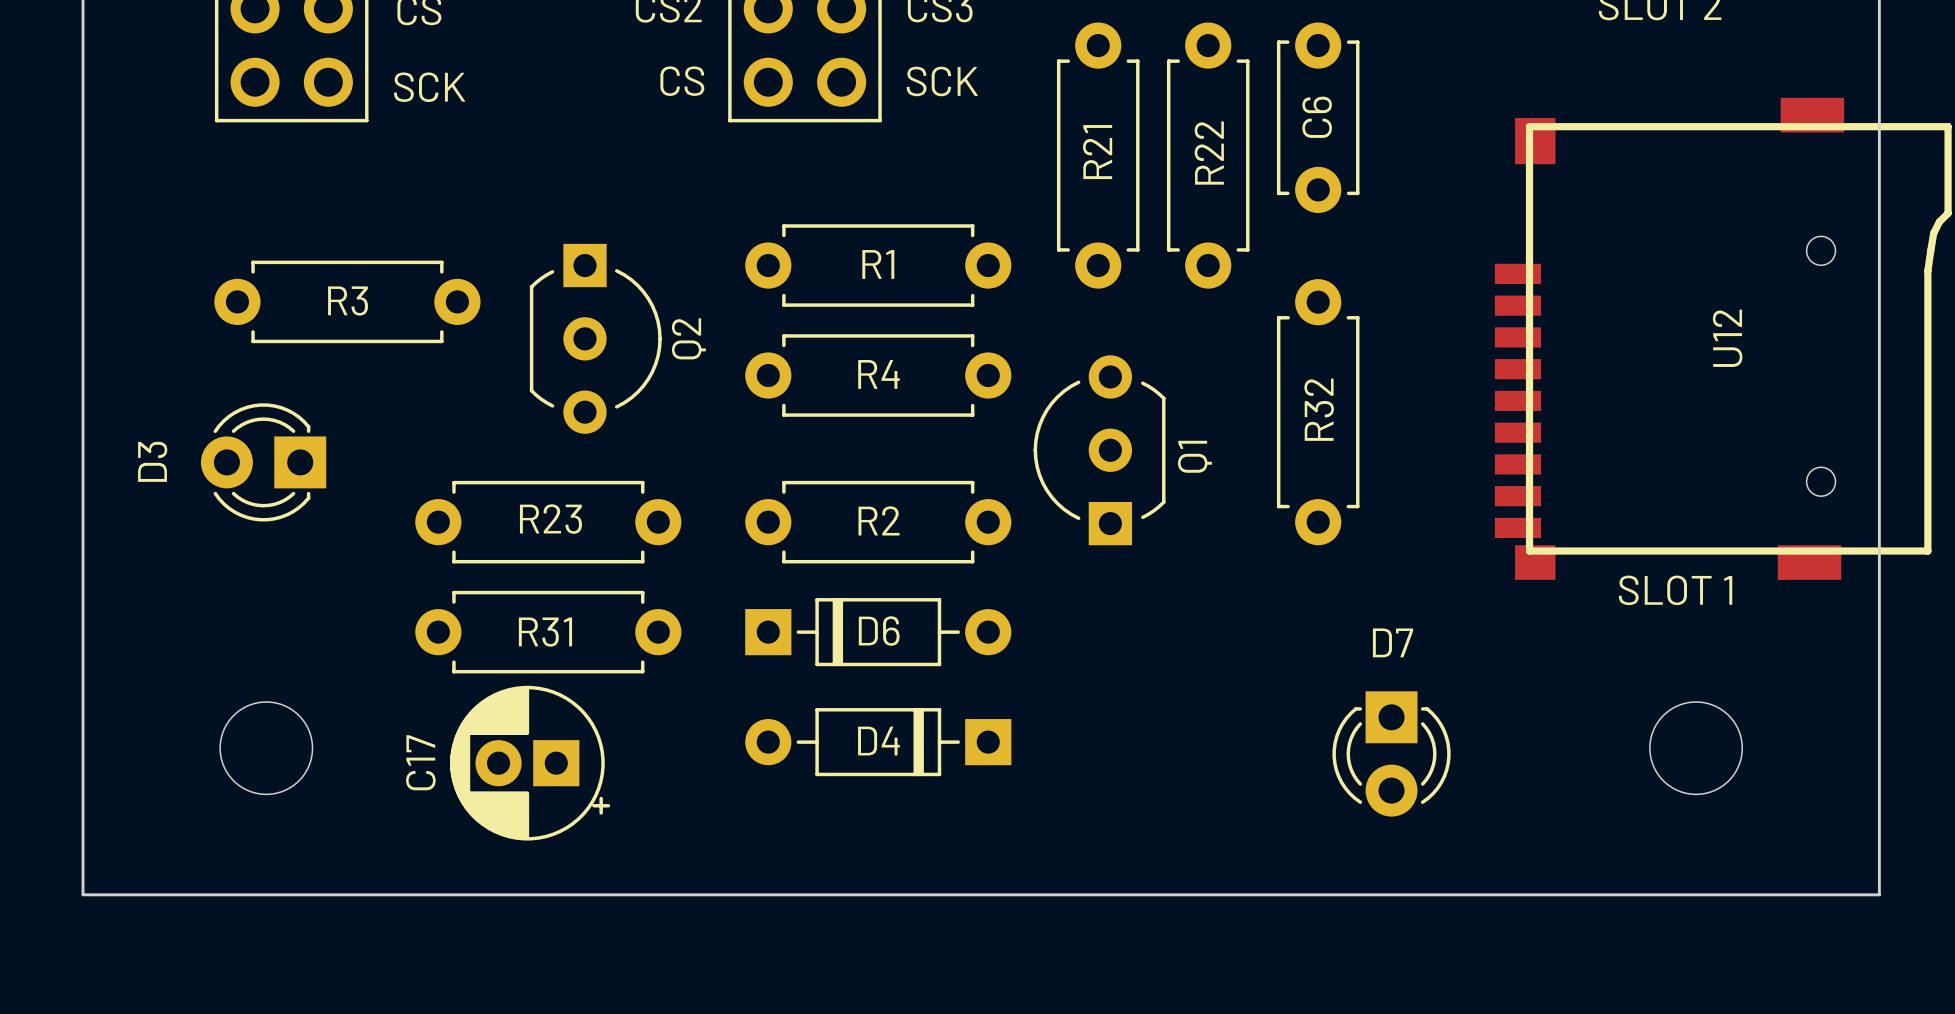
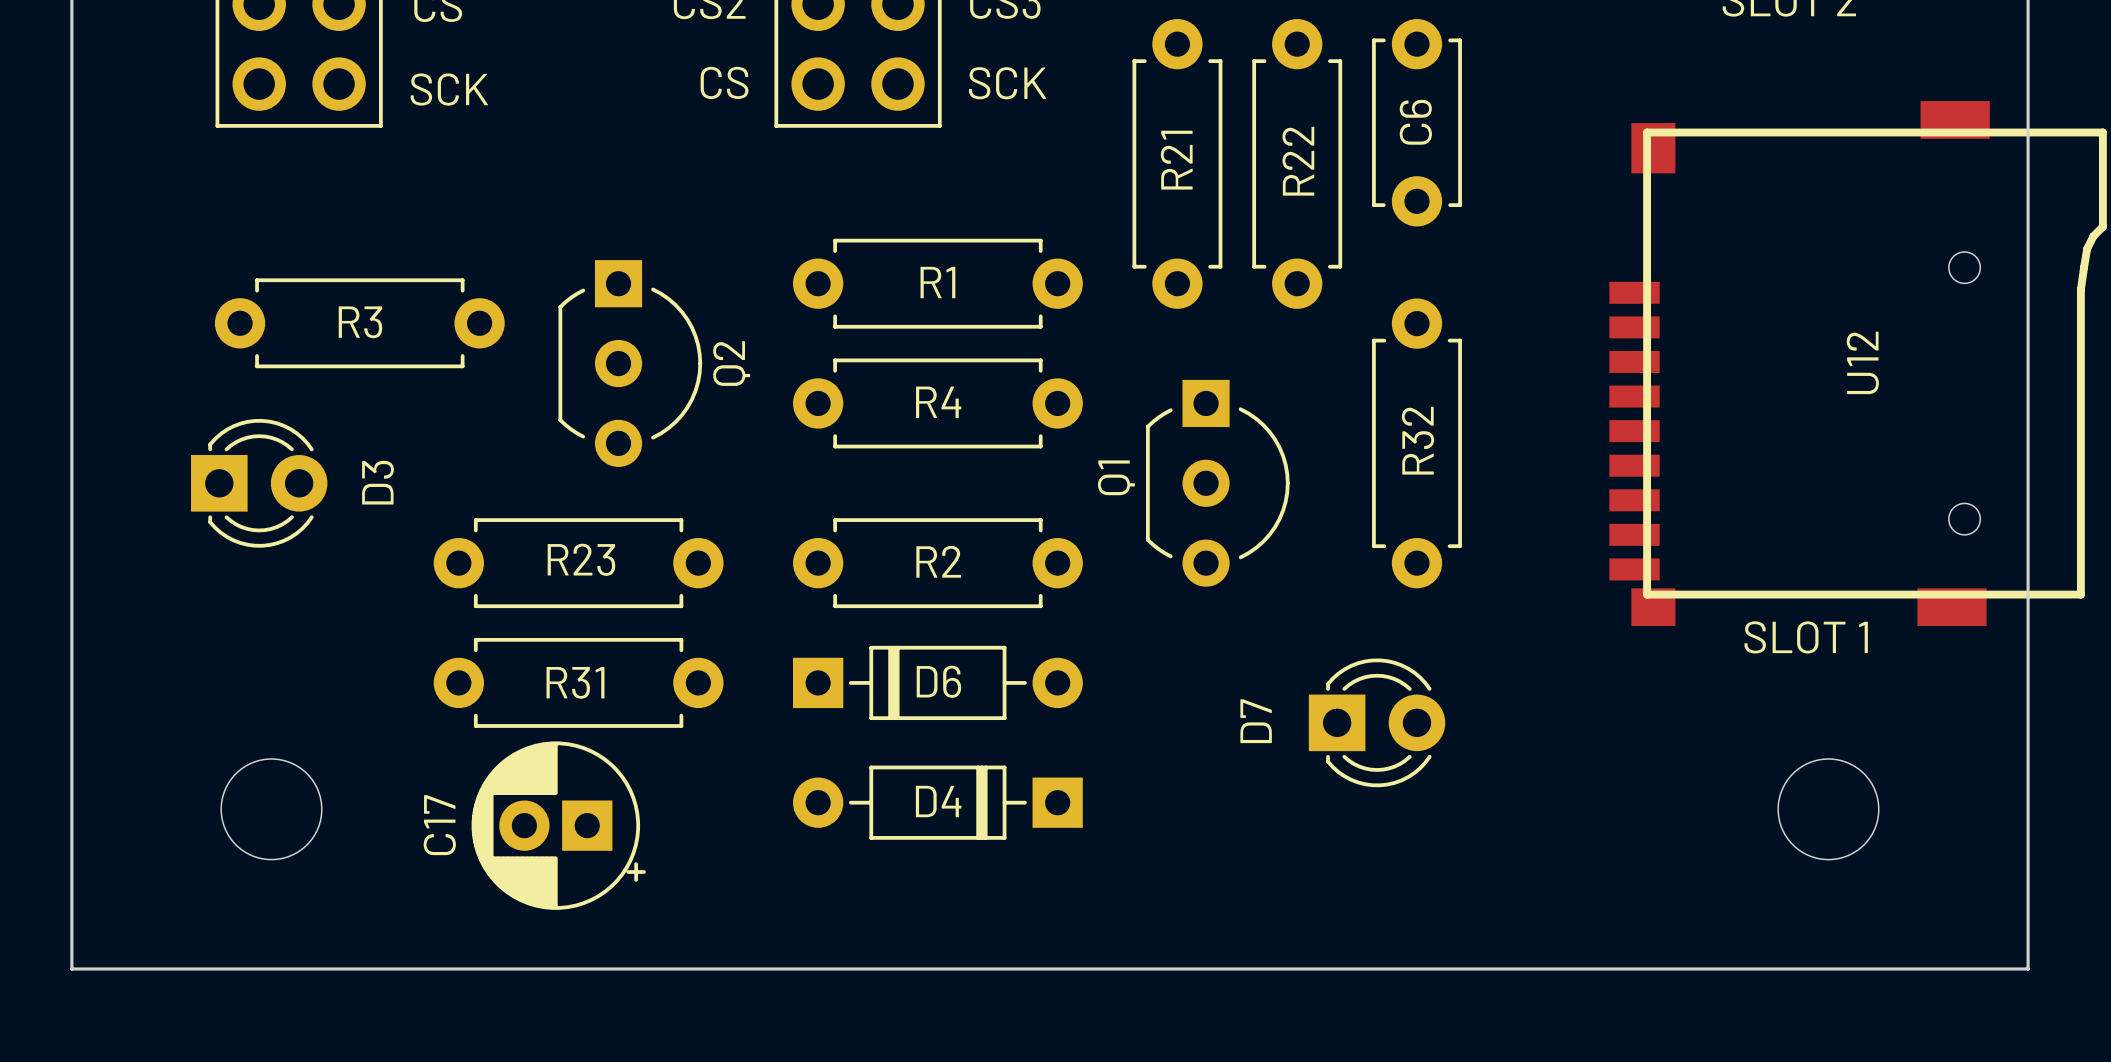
Q1 rotation: 0° (1099, 450) -> 180° (1217, 483)
D3 rotation: 0° (263, 462) -> 180° (259, 483)
D7 rotation: 0° (1391, 753) -> 90° counterclockwise (1377, 722)
D7 position: (1391, 753) -> (1377, 722)

